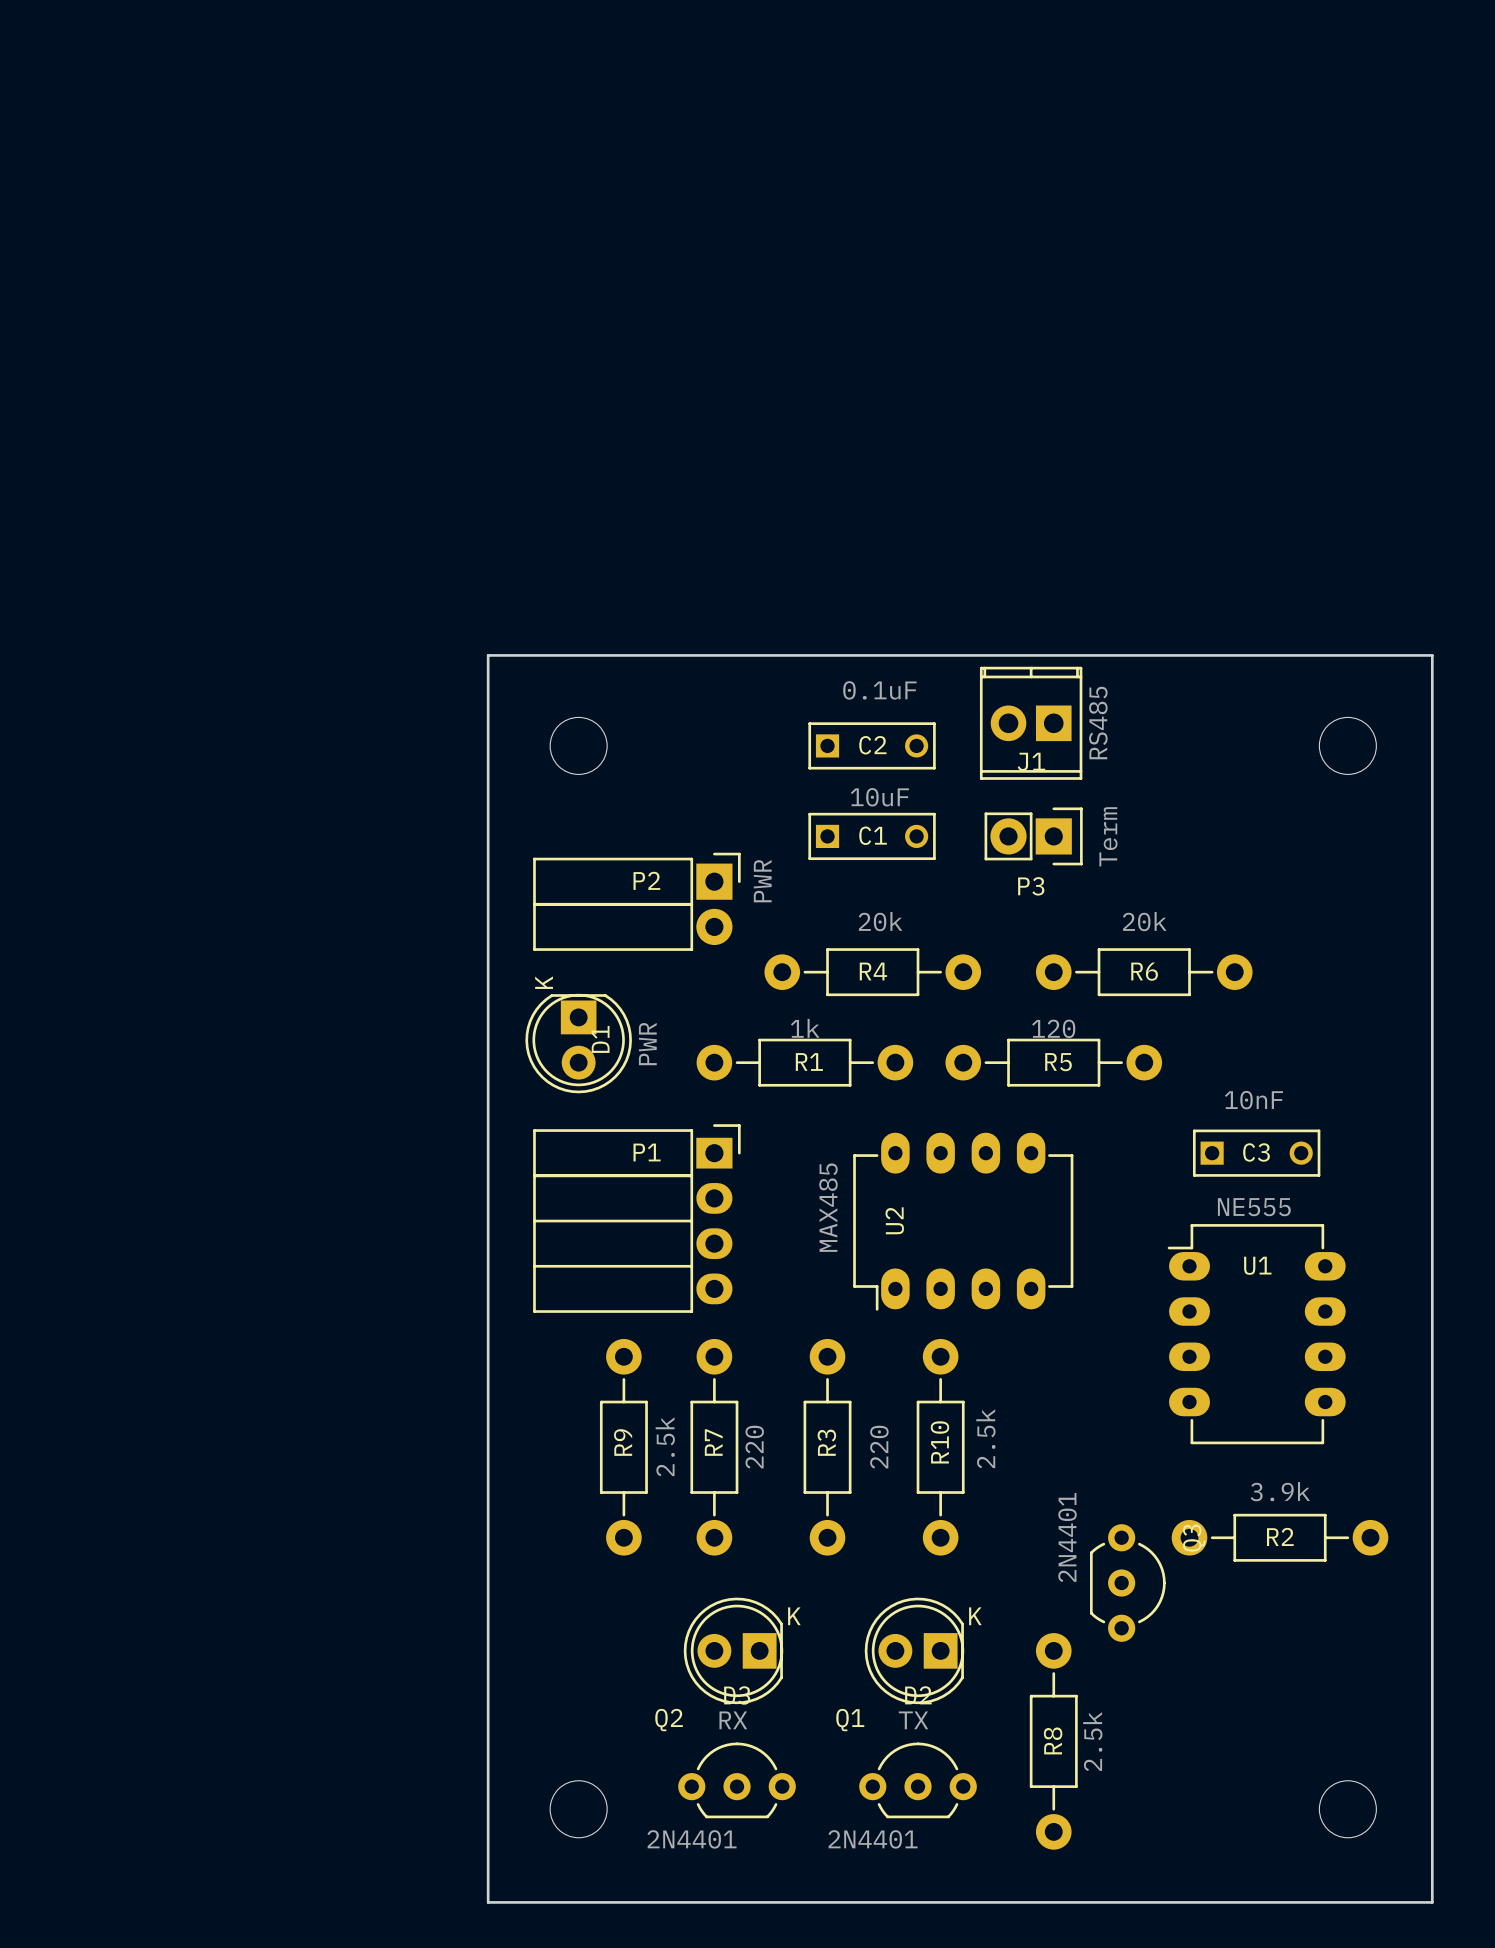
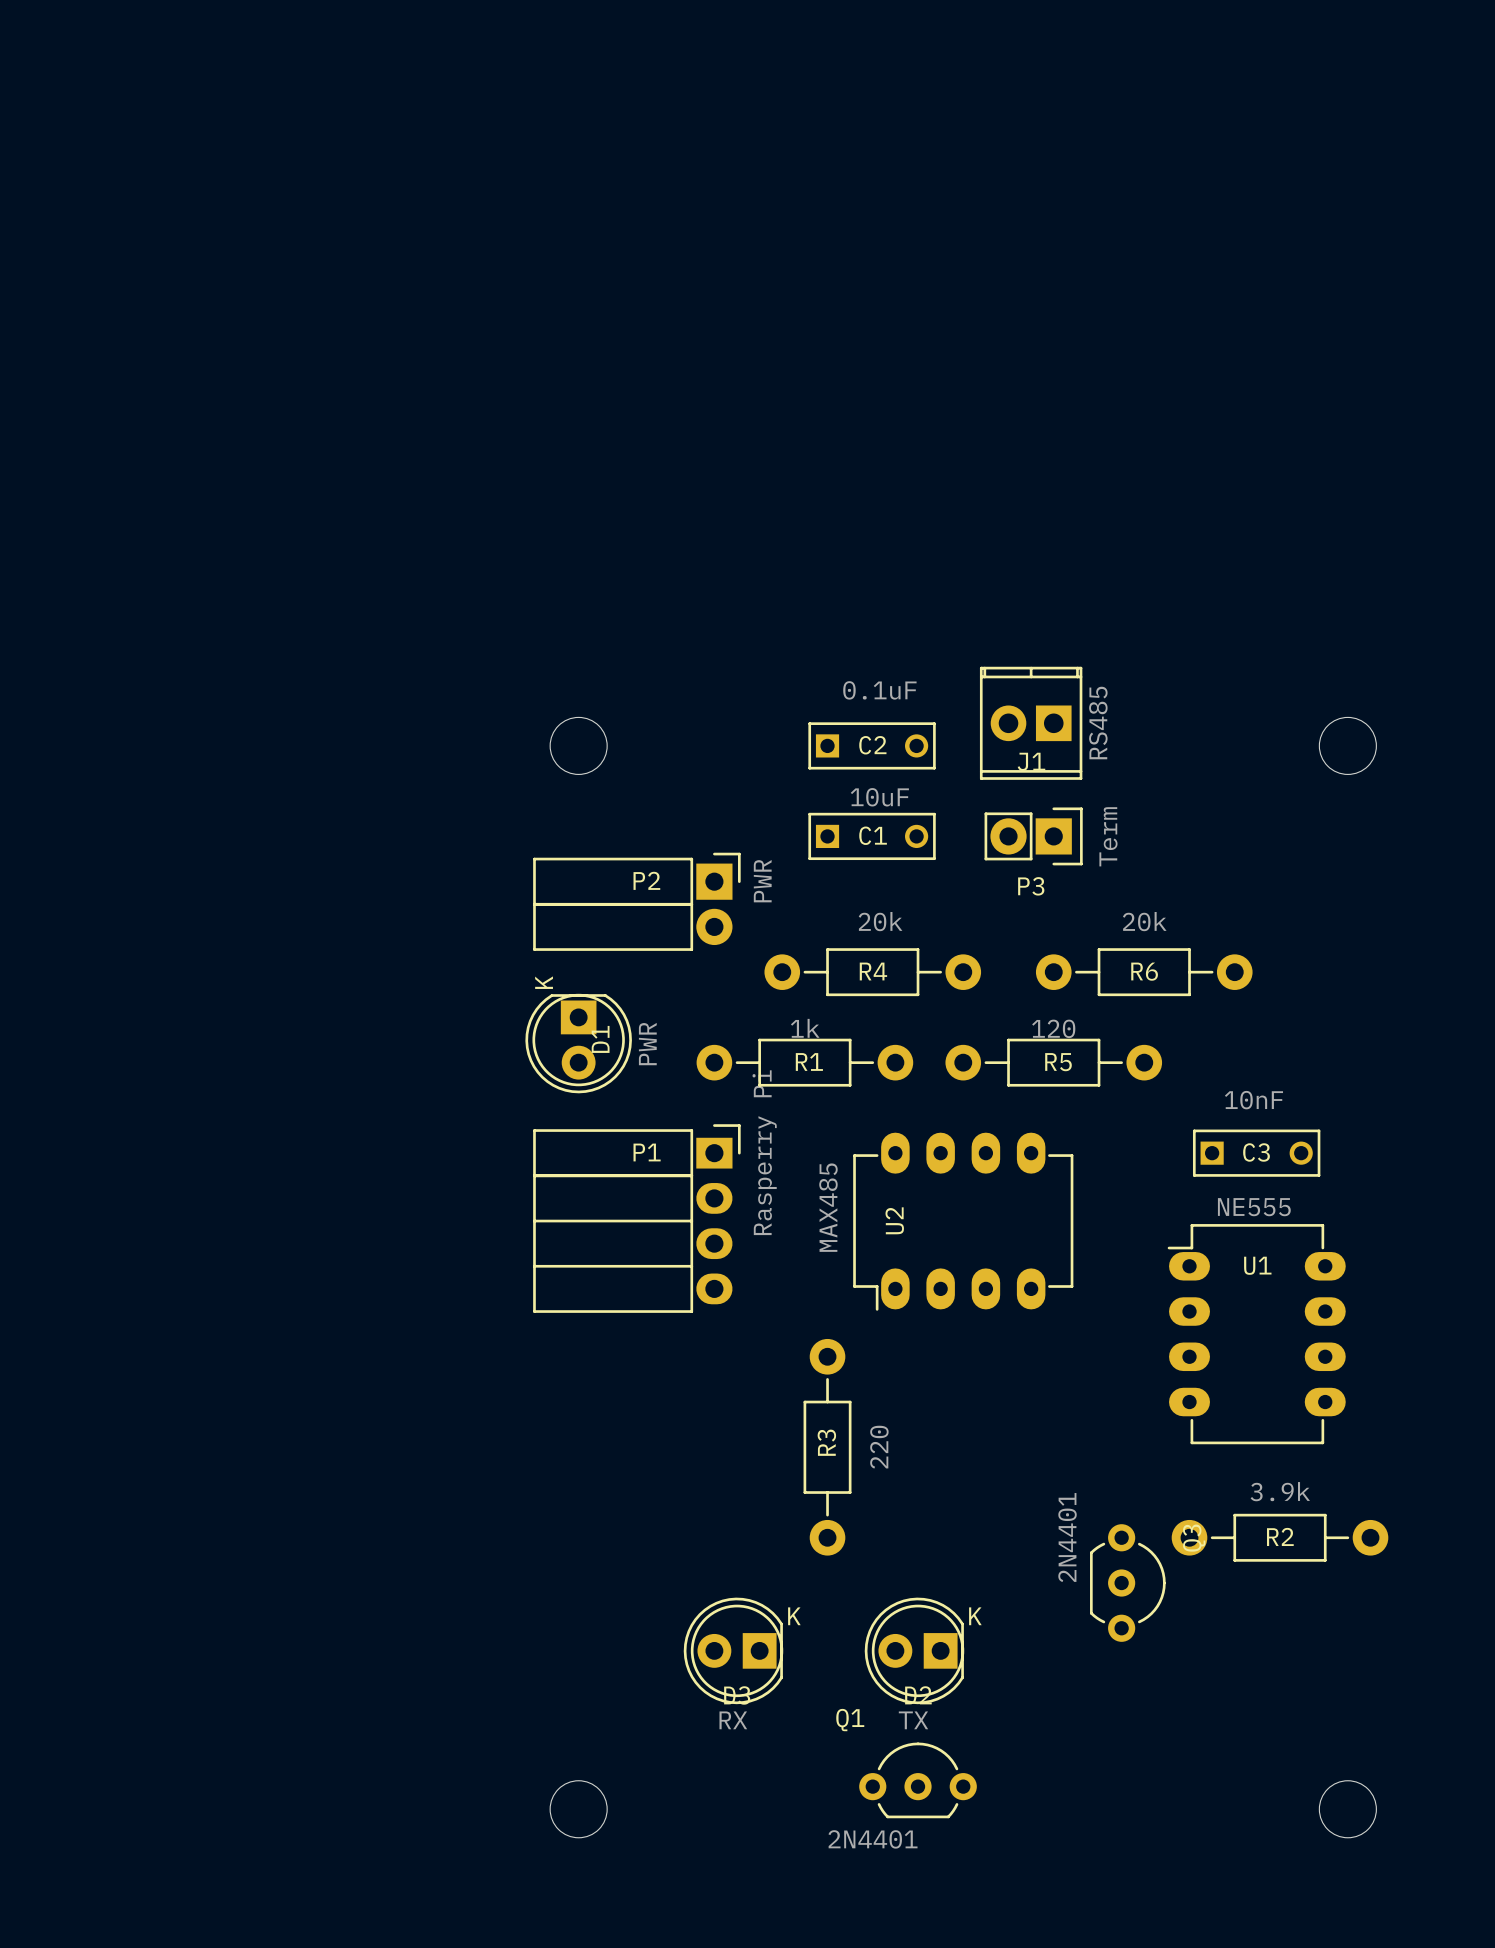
board edge: (488, 655) (1432, 655) (1432, 1902) (488, 1902) (488, 655) -> none
P1 value: none -> Rasperry Pi (764, 1152)
R9: 2.5k (623, 1447) -> none
R7: 220 (714, 1447) -> none
R10: 2.5k (940, 1447) -> none
R8: 2.5k (1053, 1741) -> none
Q2: 2N4401 (737, 1780) -> none

